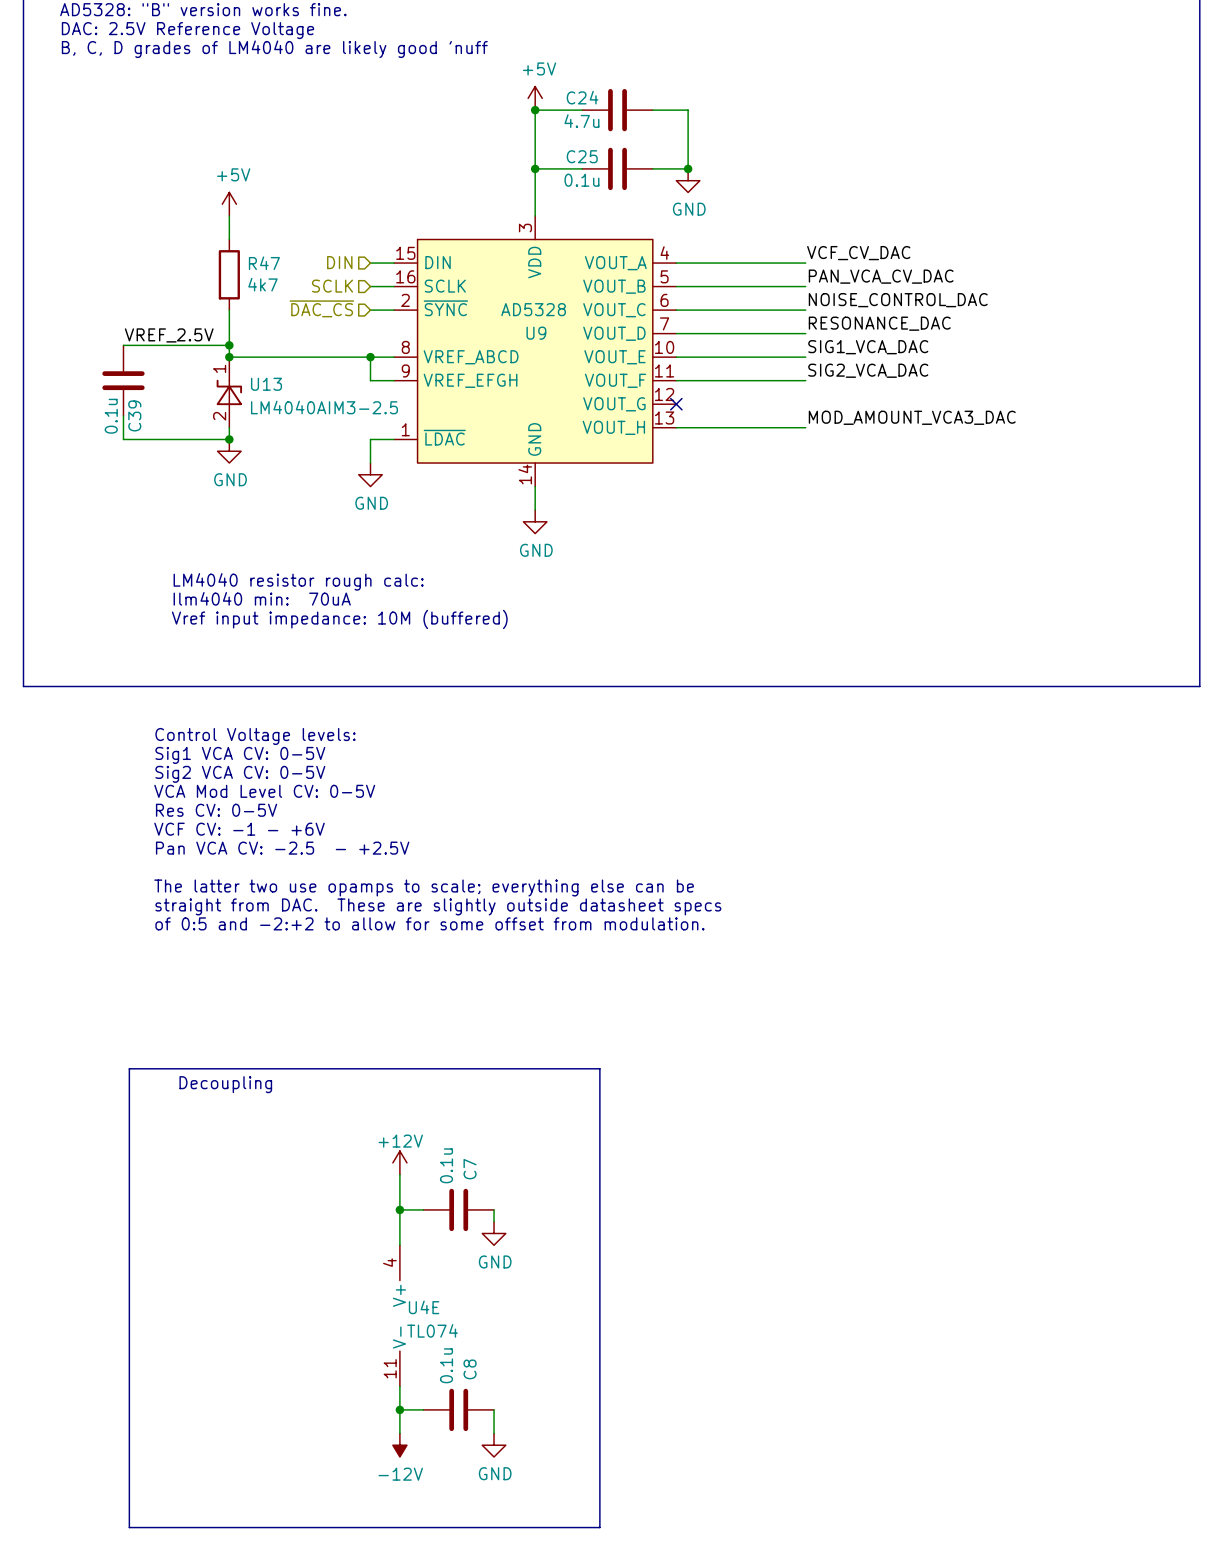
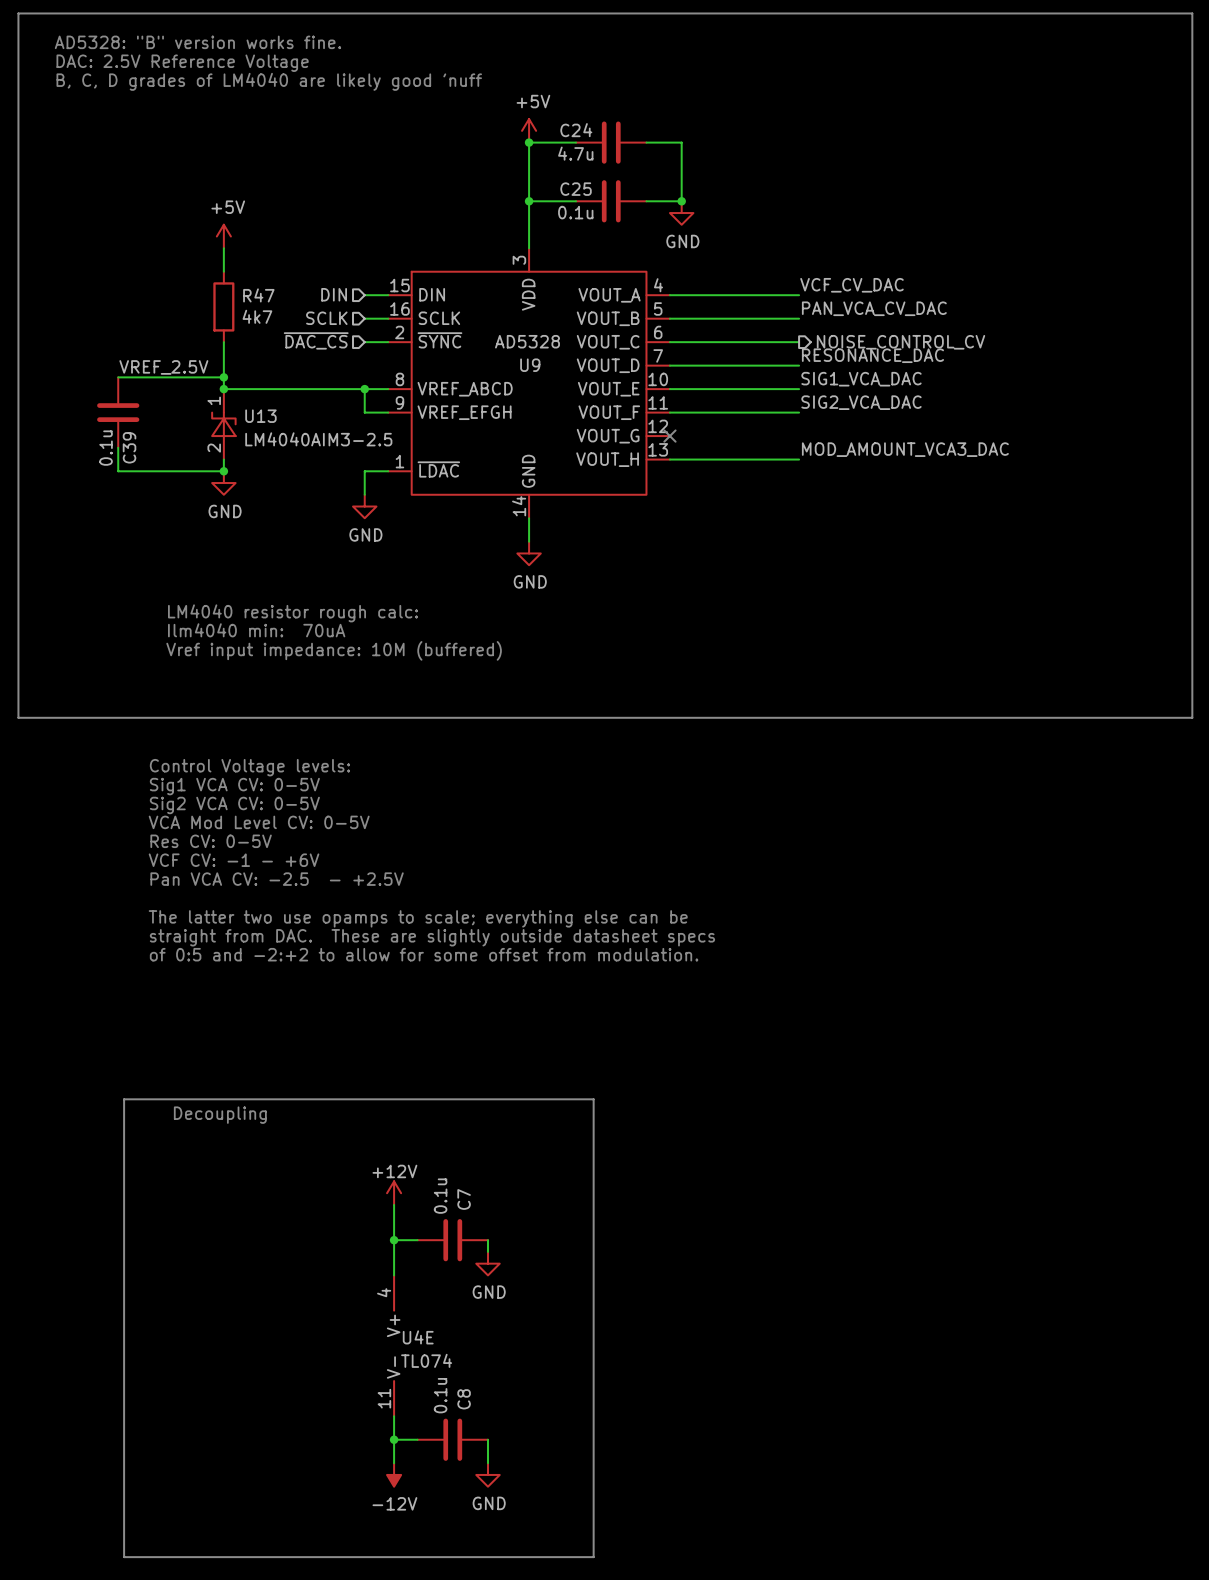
label: NOISE_CONTROL_DAC (898, 300) -> none
hierarchical label: none -> NOISE_CONTROL_CV (900, 342)

